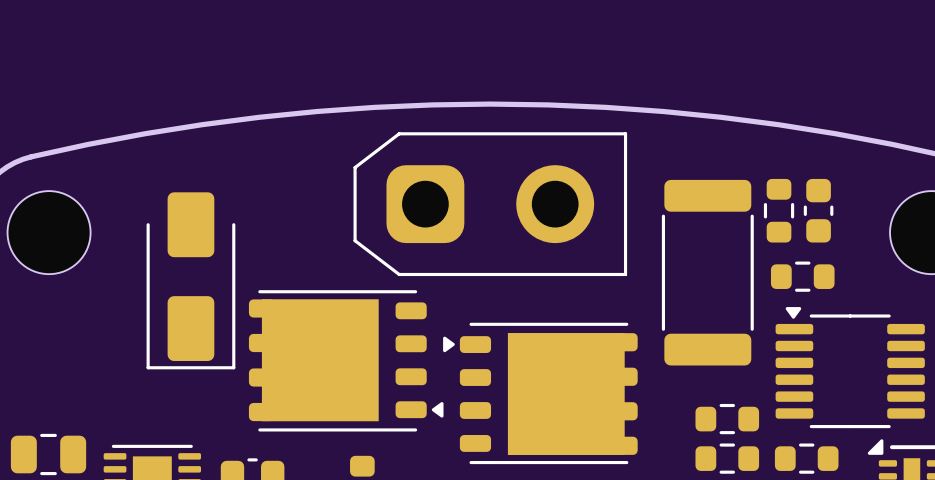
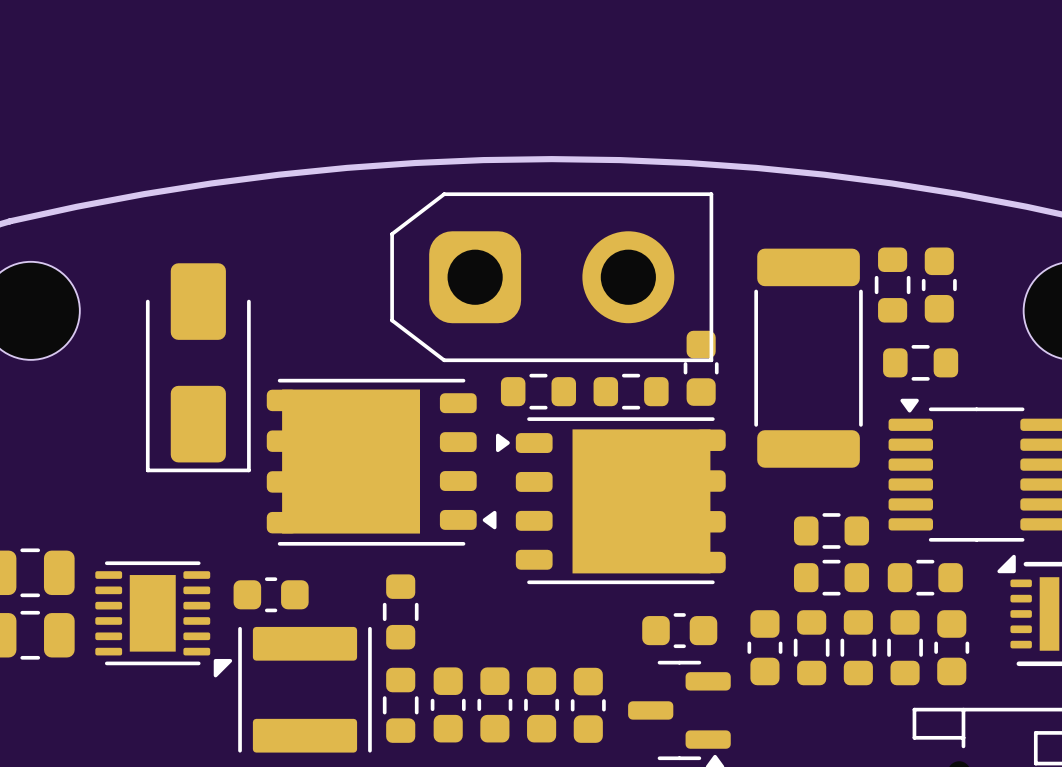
part: none -> (701, 368)
part: none -> (538, 391)
part: none -> (631, 391)

